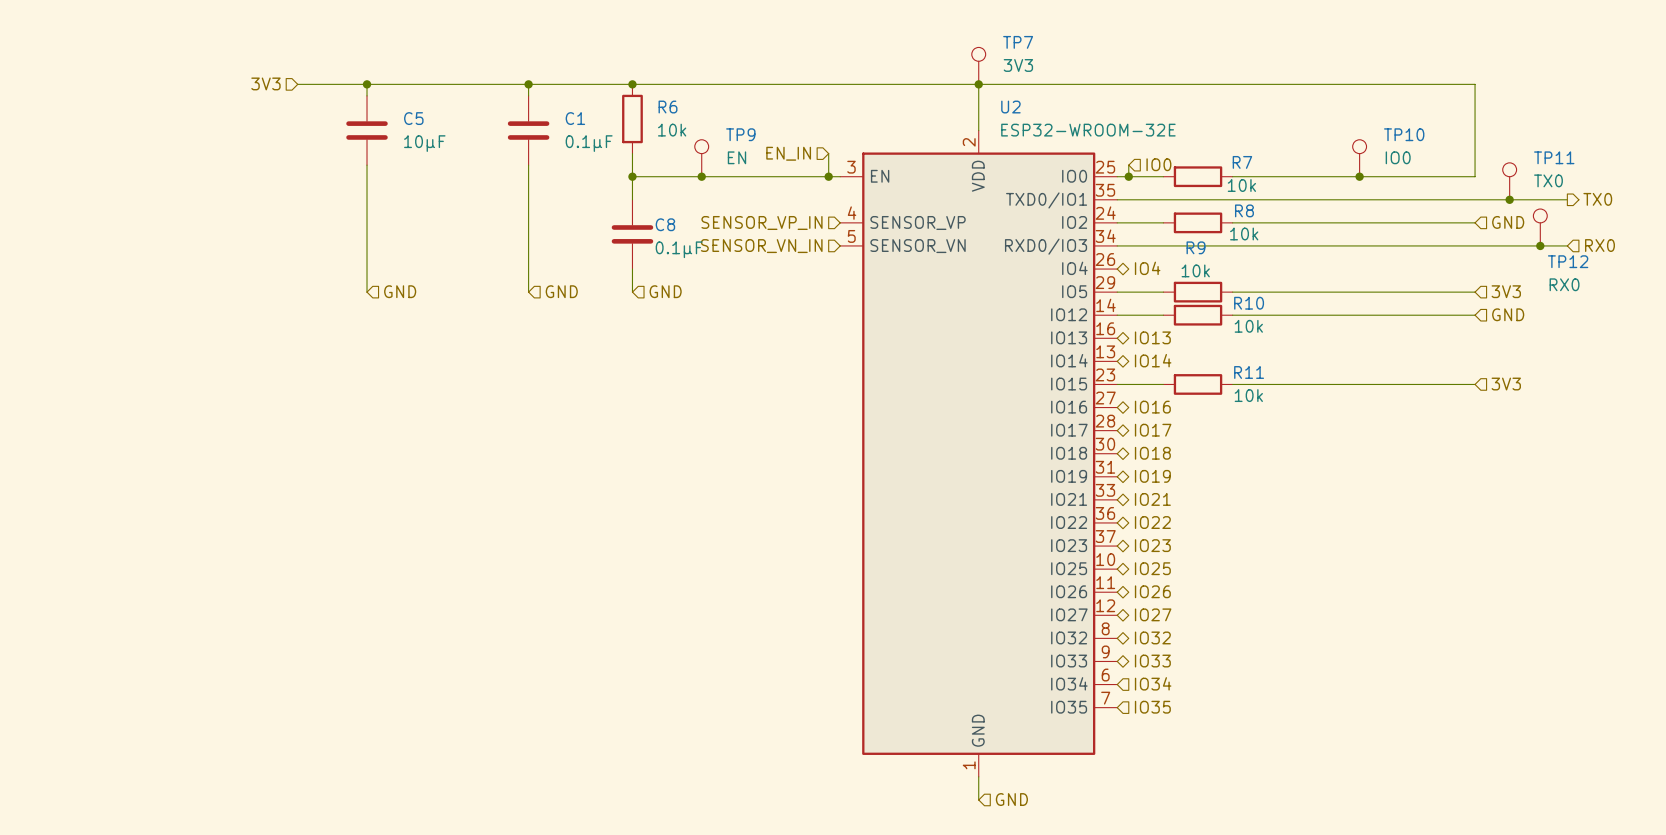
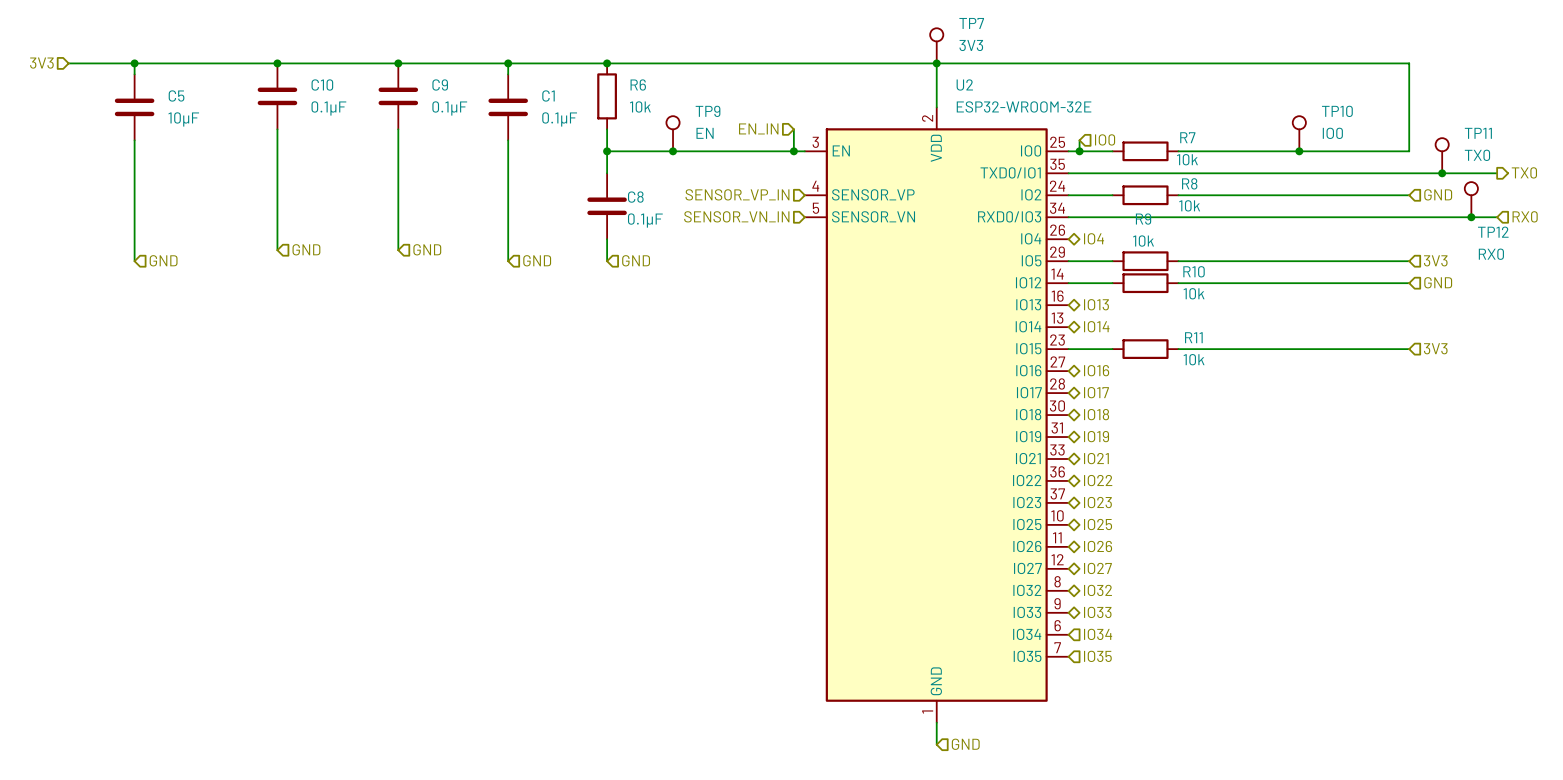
hierarchical label: none -> 3V3 (41, 63)
hierarchical label: 3V3 (265, 83) -> none
wire: none -> (68, 63) (288, 63)
wire: none -> (134, 63) (134, 74)
junction: none -> (134, 63)
junction: none -> (277, 63)
wire: (367, 84) (367, 95) -> none
junction: (367, 84) -> none
junction: none -> (398, 63)
C10: none -> 0.1µF (277, 96)
C9: none -> 0.1µF (398, 96)
C5 position: (367, 130) -> (134, 107)
wire: none -> (277, 129) (277, 250)
wire: none -> (134, 140) (134, 261)
wire: (367, 165) (367, 292) -> (398, 129) (398, 250)
hierarchical label: none -> GND (306, 249)
hierarchical label: none -> GND (427, 249)
hierarchical label: none -> GND (163, 260)
hierarchical label: GND (400, 291) -> none

